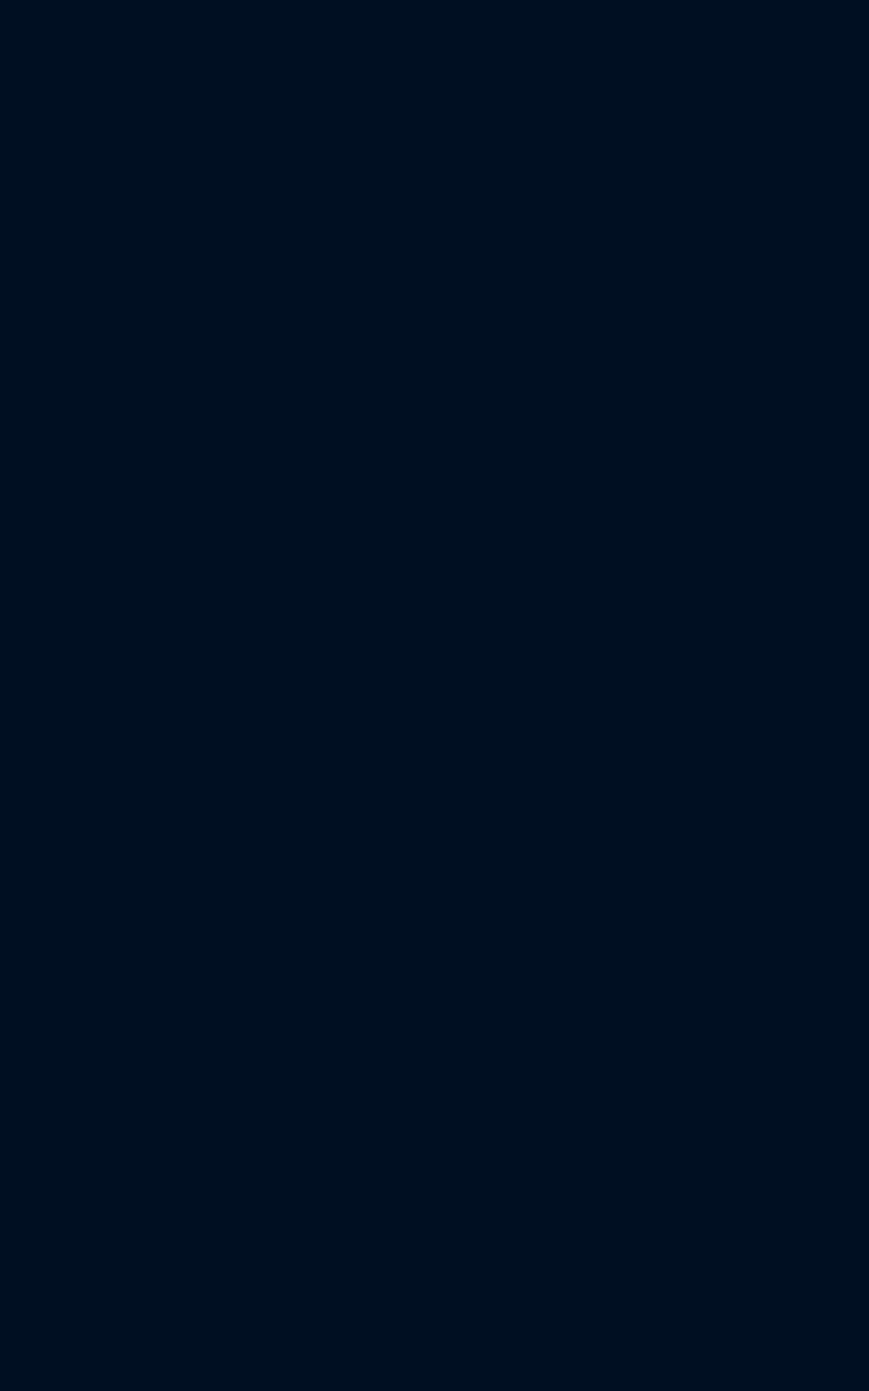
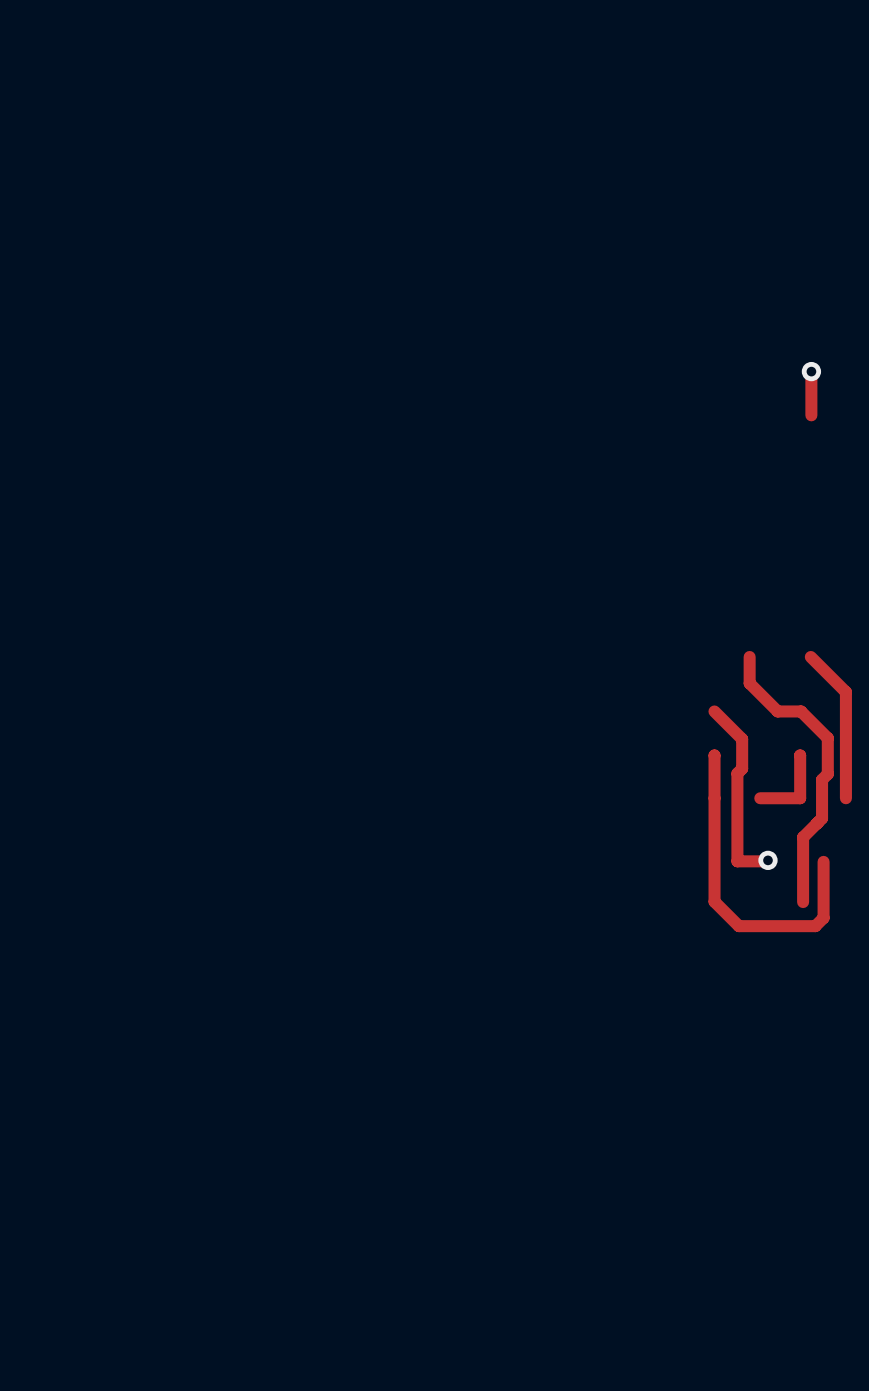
track: none -> (811, 371) (811, 415)
via: none -> (811, 371)
track: none -> (749, 656) (749, 683) (777, 711) (801, 711) (827, 738) (827, 774) (822, 779) (822, 818) (803, 837) (803, 902)
track: none -> (810, 656) (845, 692) (845, 798)
track: none -> (714, 711) (742, 739) (742, 768) (737, 773) (737, 861) (767, 860)
track: none -> (714, 755) (714, 901) (738, 926) (815, 926) (823, 917) (823, 861)
track: none -> (800, 755) (800, 798) (760, 798)
via: none -> (767, 860)

